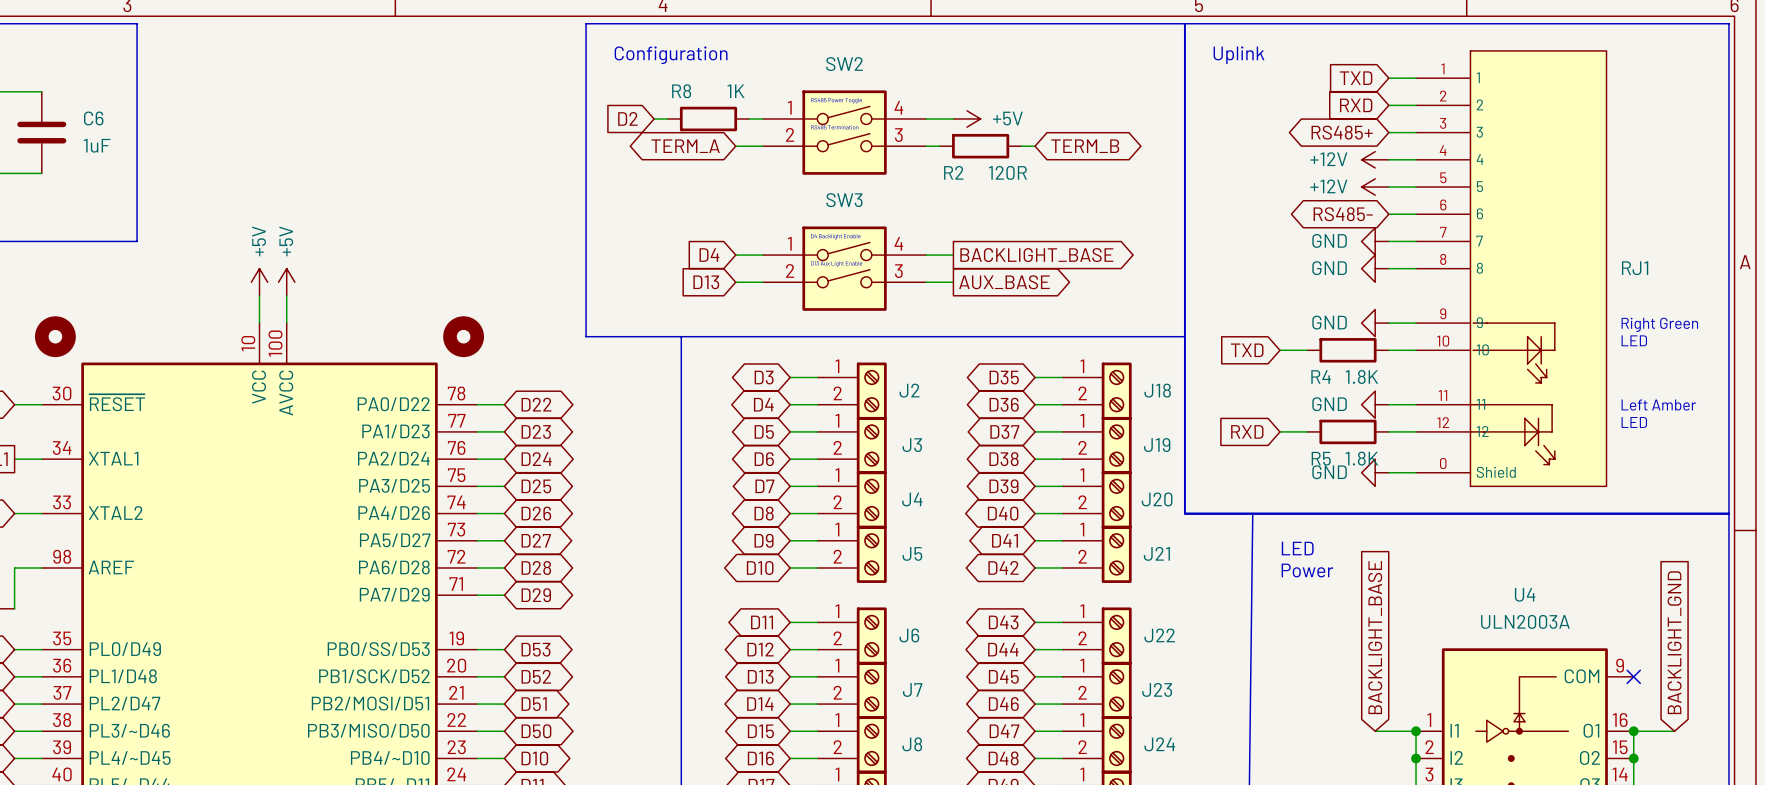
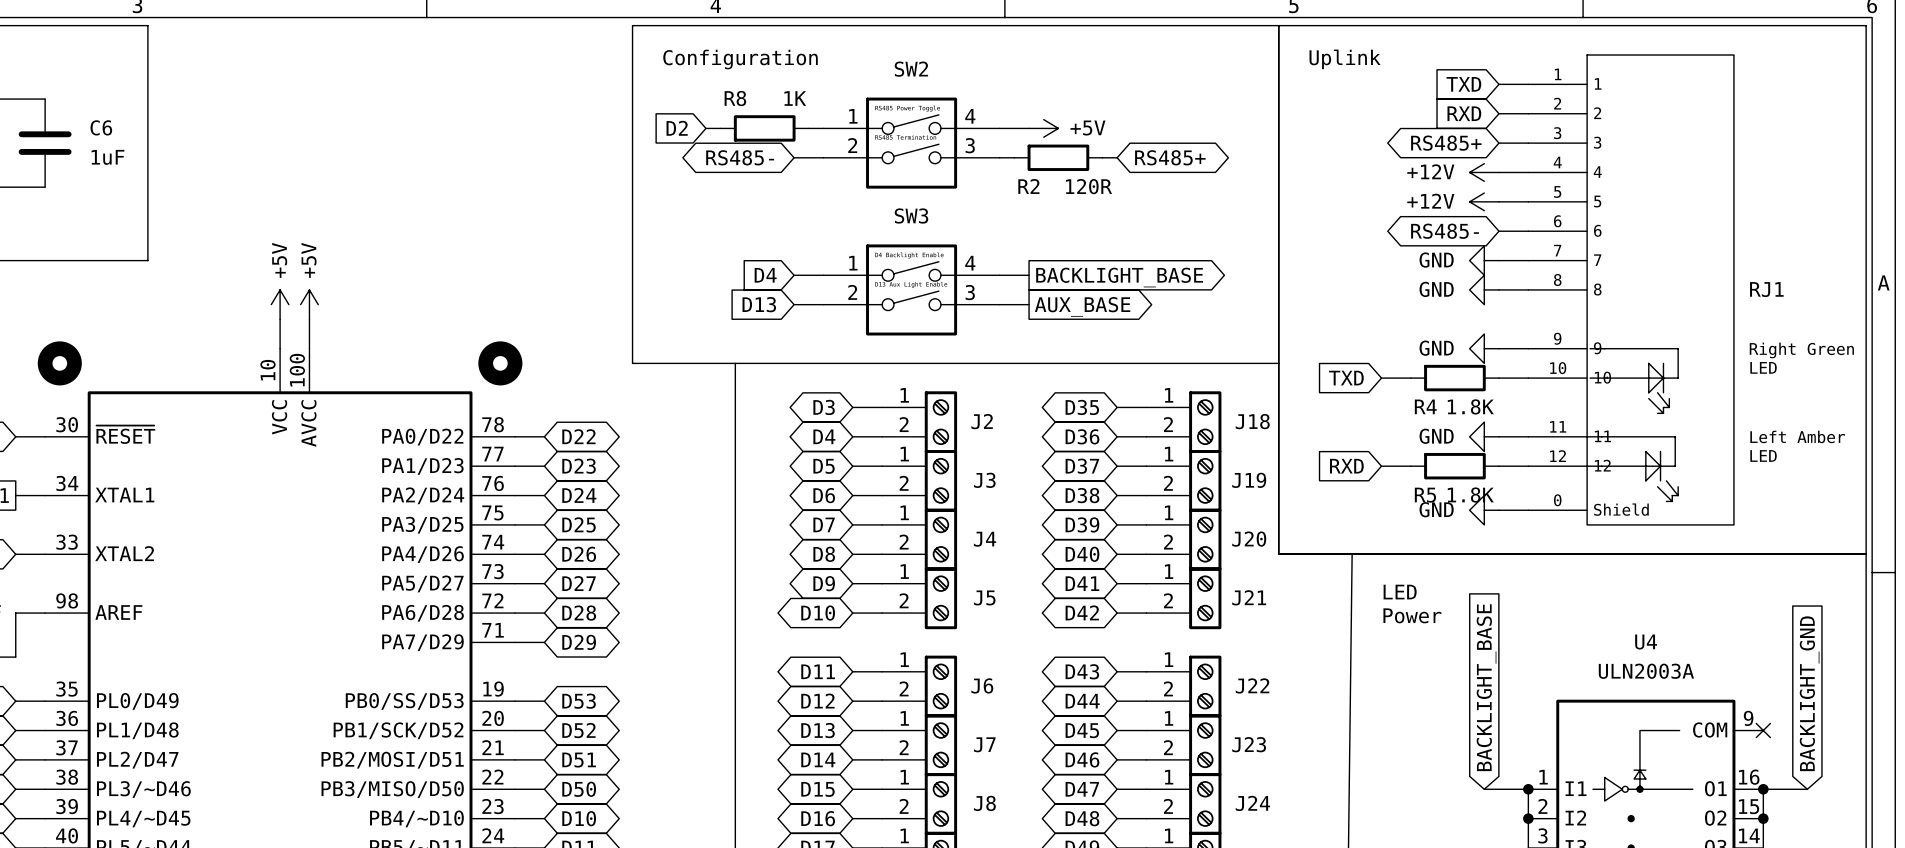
global label: TERM_A (685, 146) -> RS485- (740, 157)
global label: TERM_B (1085, 146) -> RS485+ (1170, 157)

